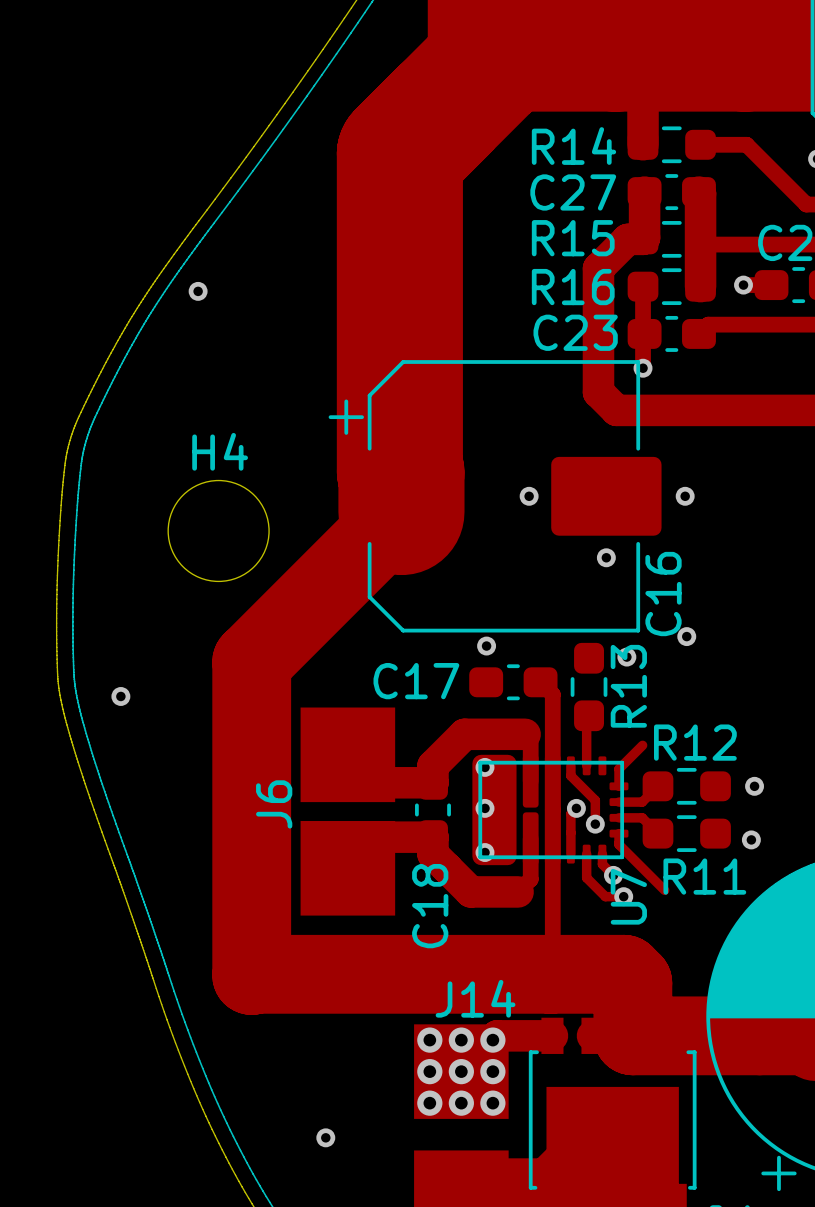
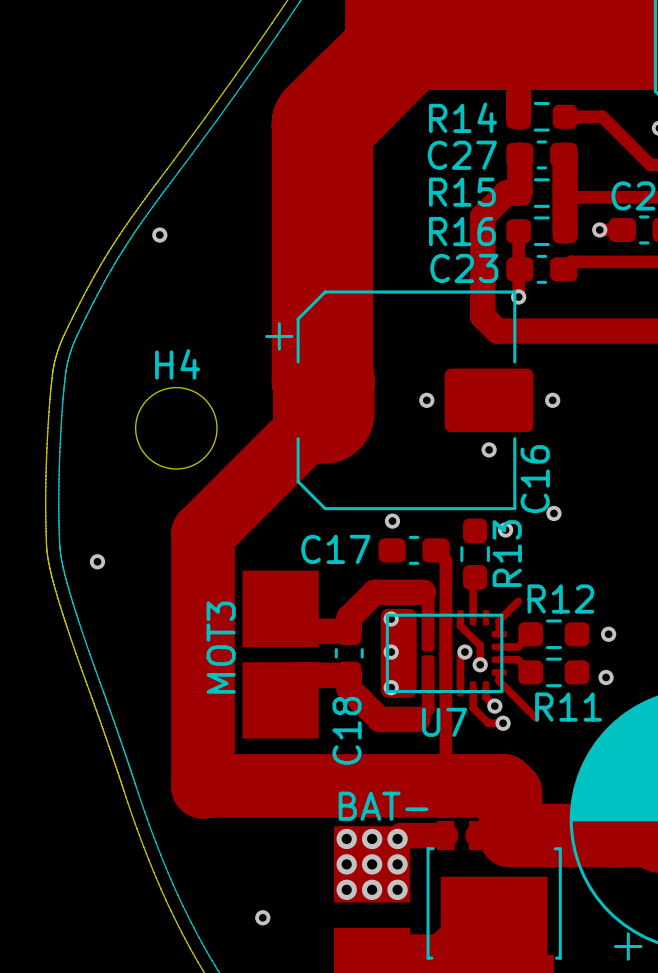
J6 name: J6 (274, 804) -> MOT3 (221, 647)
U7 name rotation: 0° (628, 896) -> 90° clockwise (444, 722)
U7 name position: U7 (628, 896) -> U7 (444, 722)
J14 name: J14 (475, 998) -> BAT- (383, 806)

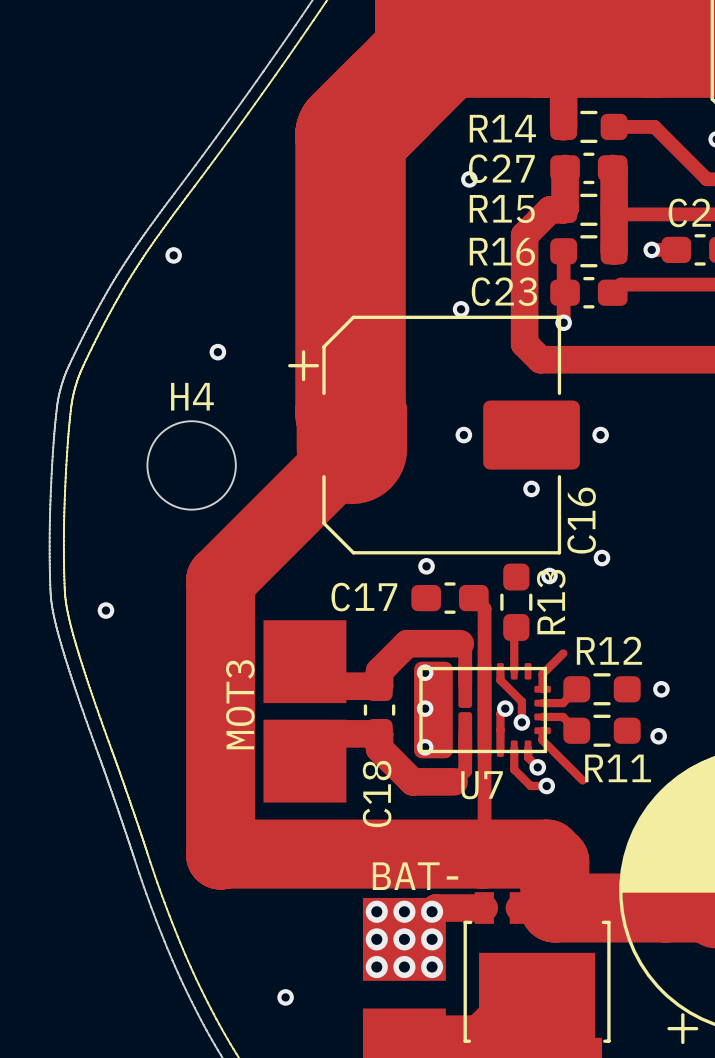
via: none -> (469, 179)
via: none -> (461, 309)
via: none -> (217, 352)

